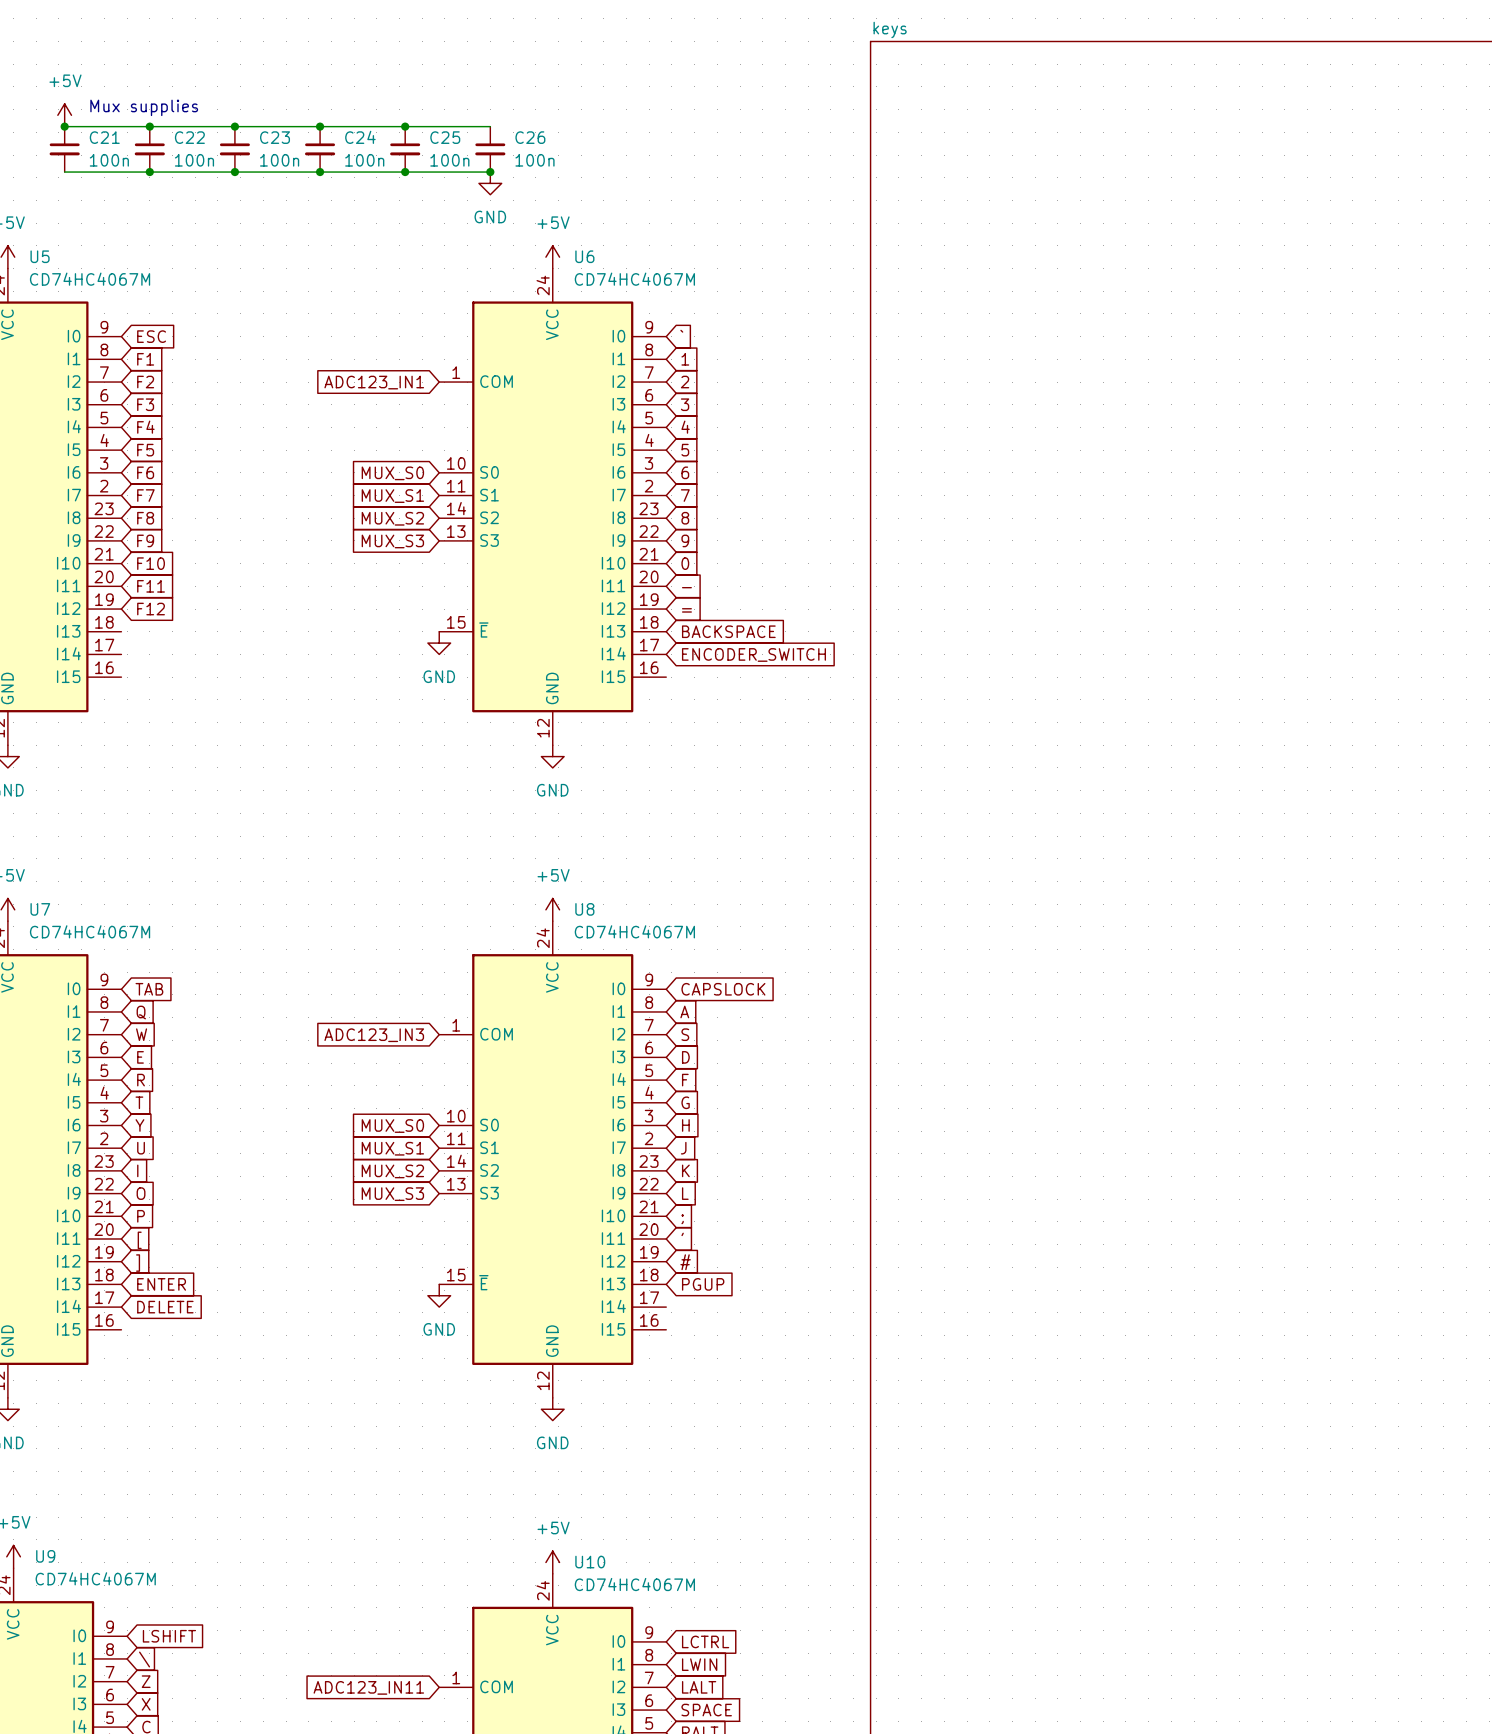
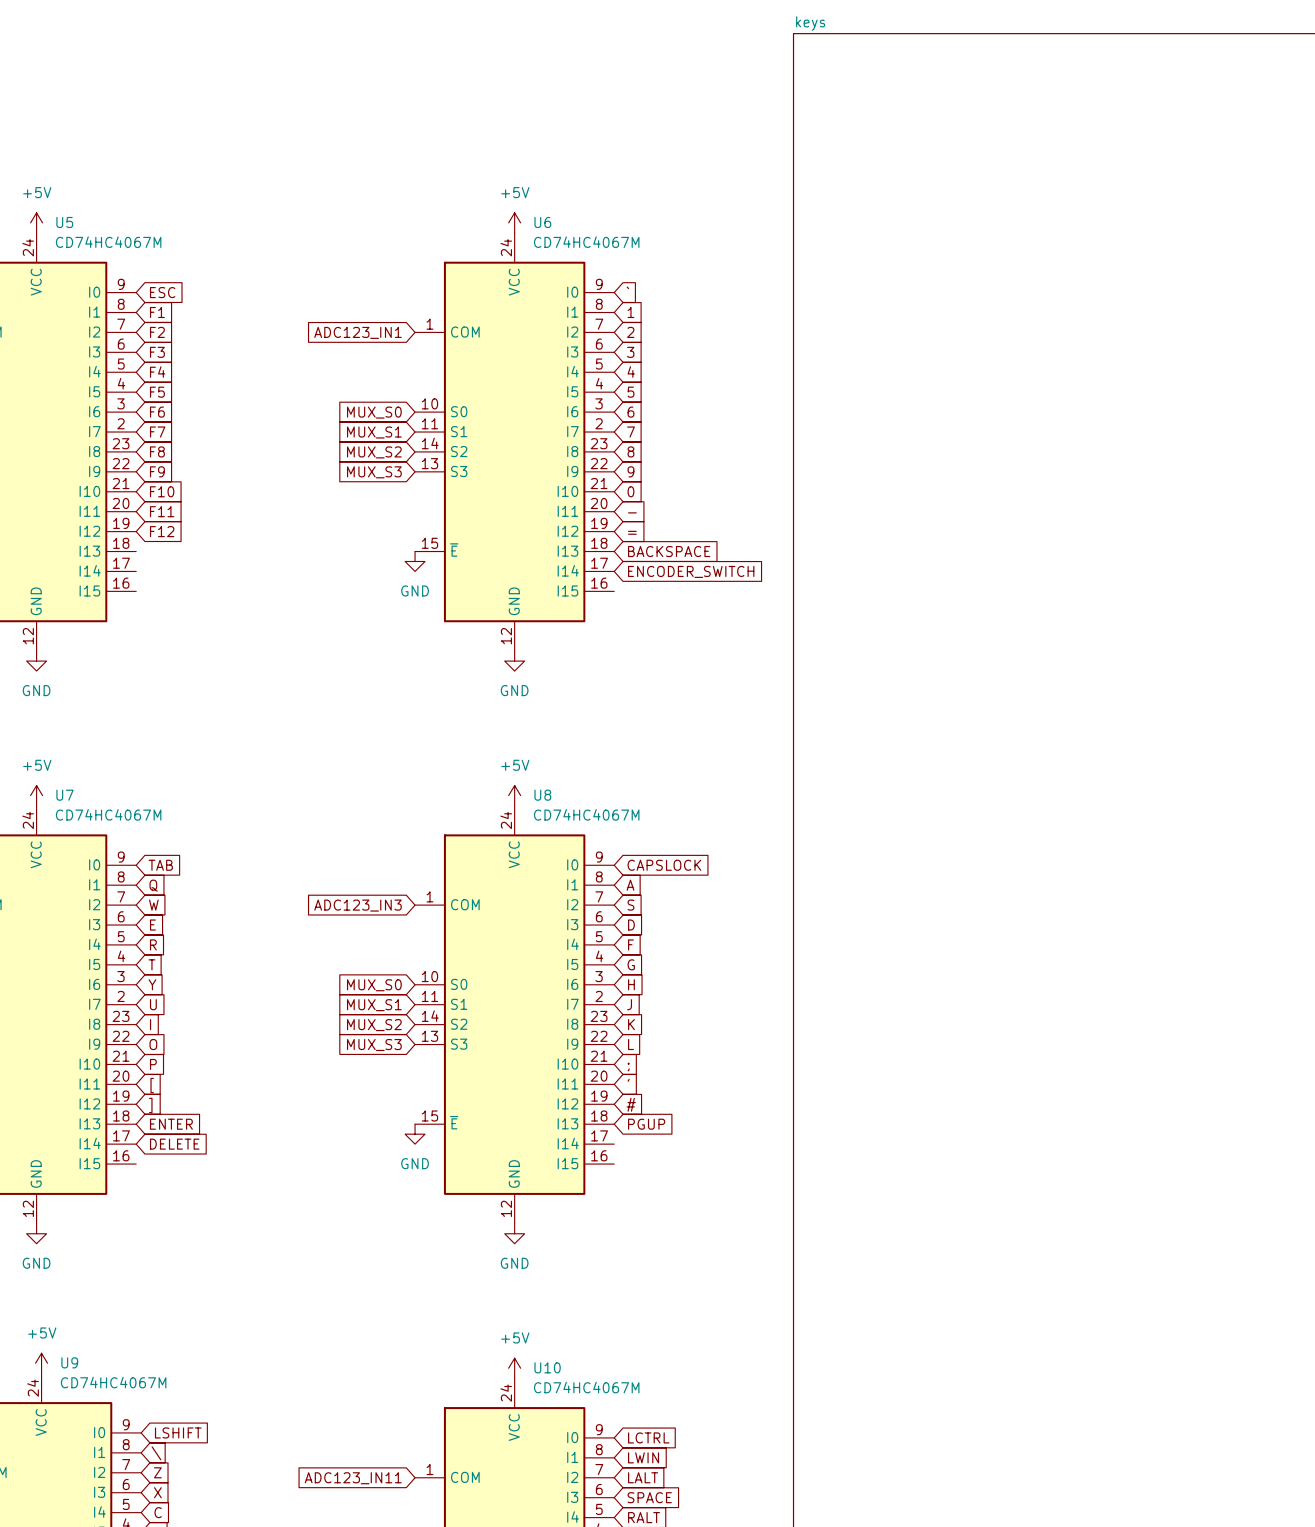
text: Mux supplies (144, 107) -> none
power symbol: +5V (64, 115) -> none
wire: (64, 126) (490, 126) -> none
junction: (64, 126) -> none
junction: (149, 126) -> none
junction: (234, 126) -> none
junction: (320, 126) -> none
junction: (405, 126) -> none
C21: 100n (64, 149) -> none
C22: 100n (149, 149) -> none
C23: 100n (234, 149) -> none
C24: 100n (320, 149) -> none
C25: 100n (405, 149) -> none
C26: 100n (490, 149) -> none
wire: (64, 172) (490, 172) -> none
junction: (149, 172) -> none
junction: (234, 172) -> none
junction: (320, 172) -> none
junction: (405, 172) -> none
junction: (490, 172) -> none
power symbol: GND (490, 183) -> none

